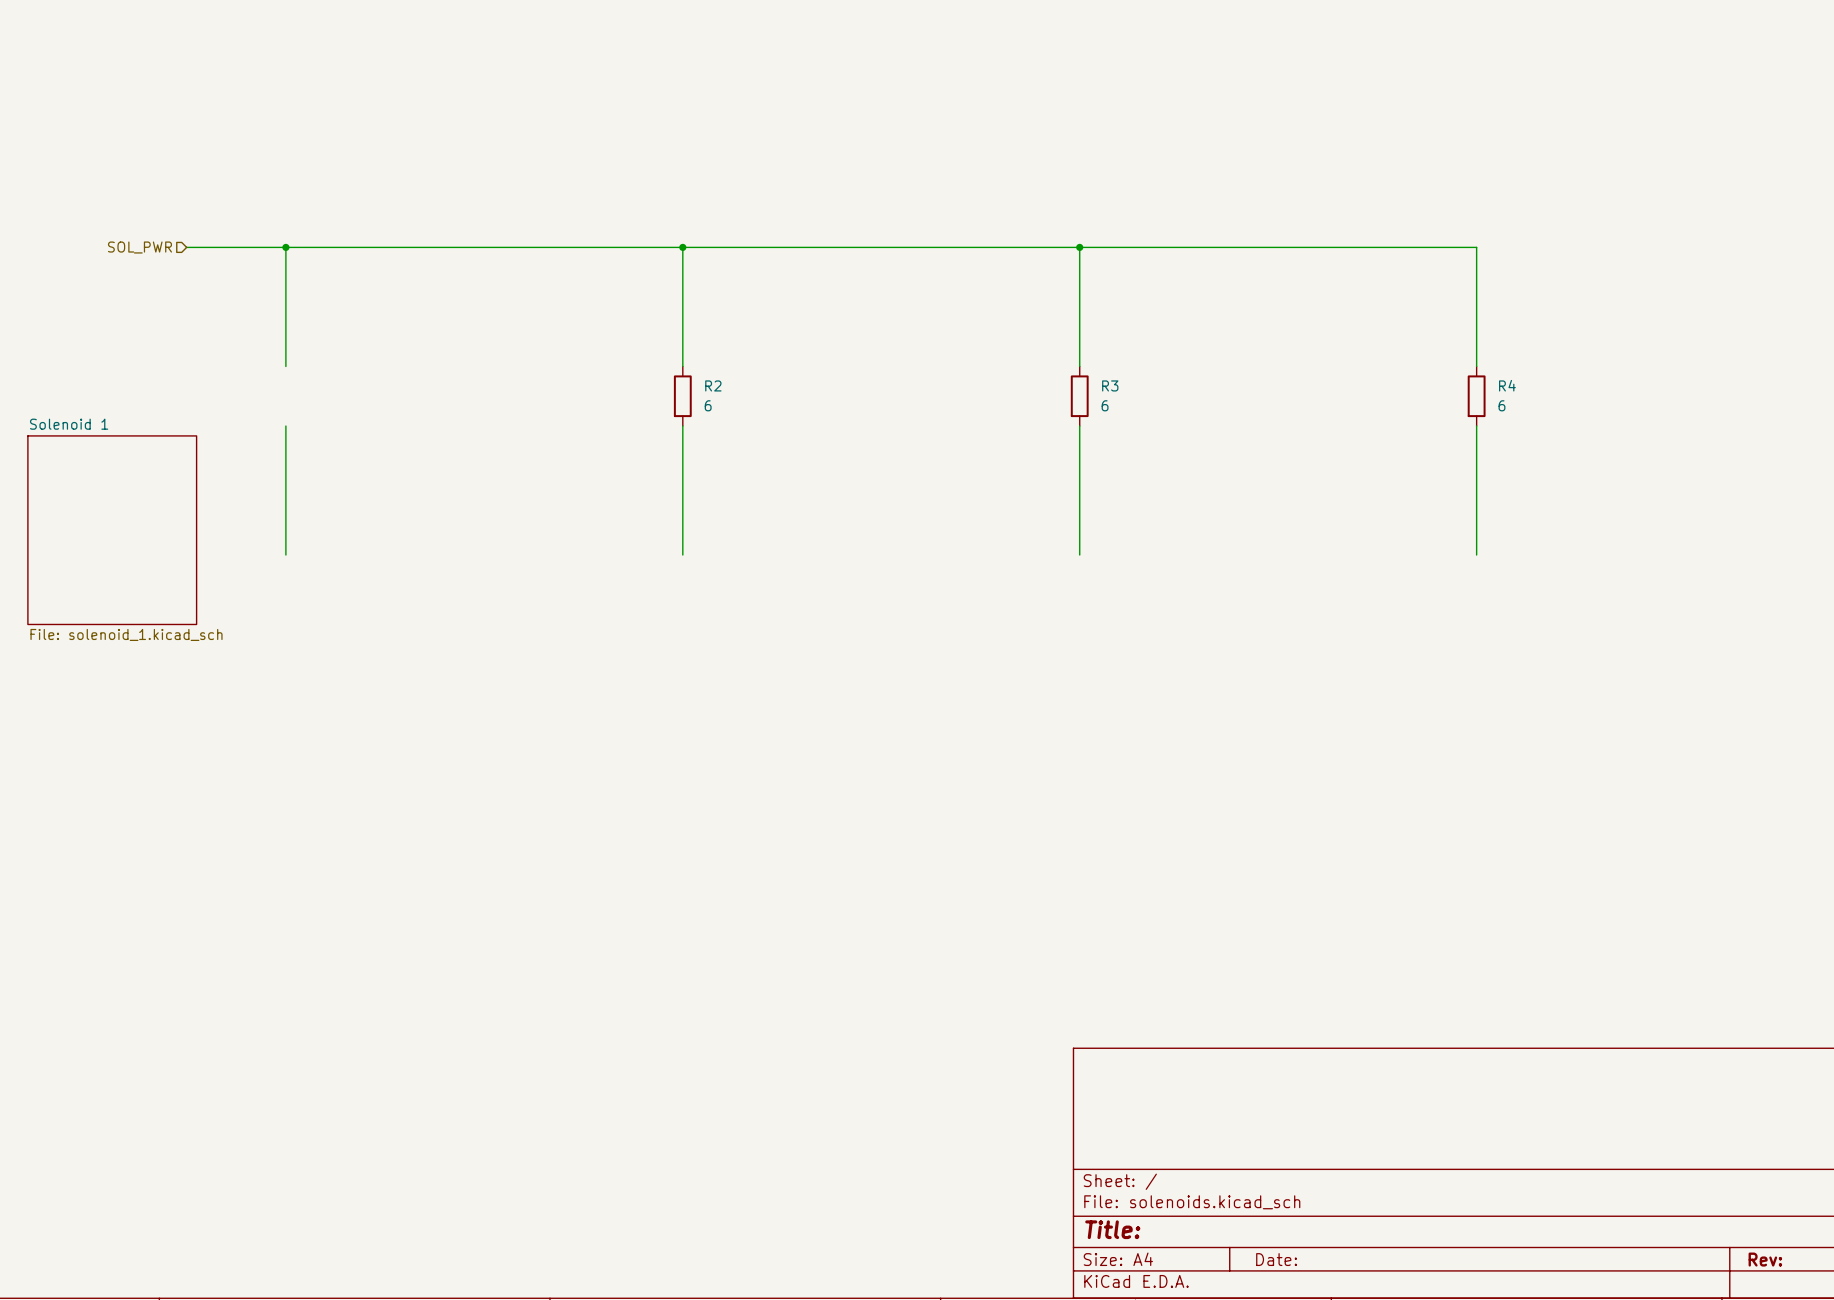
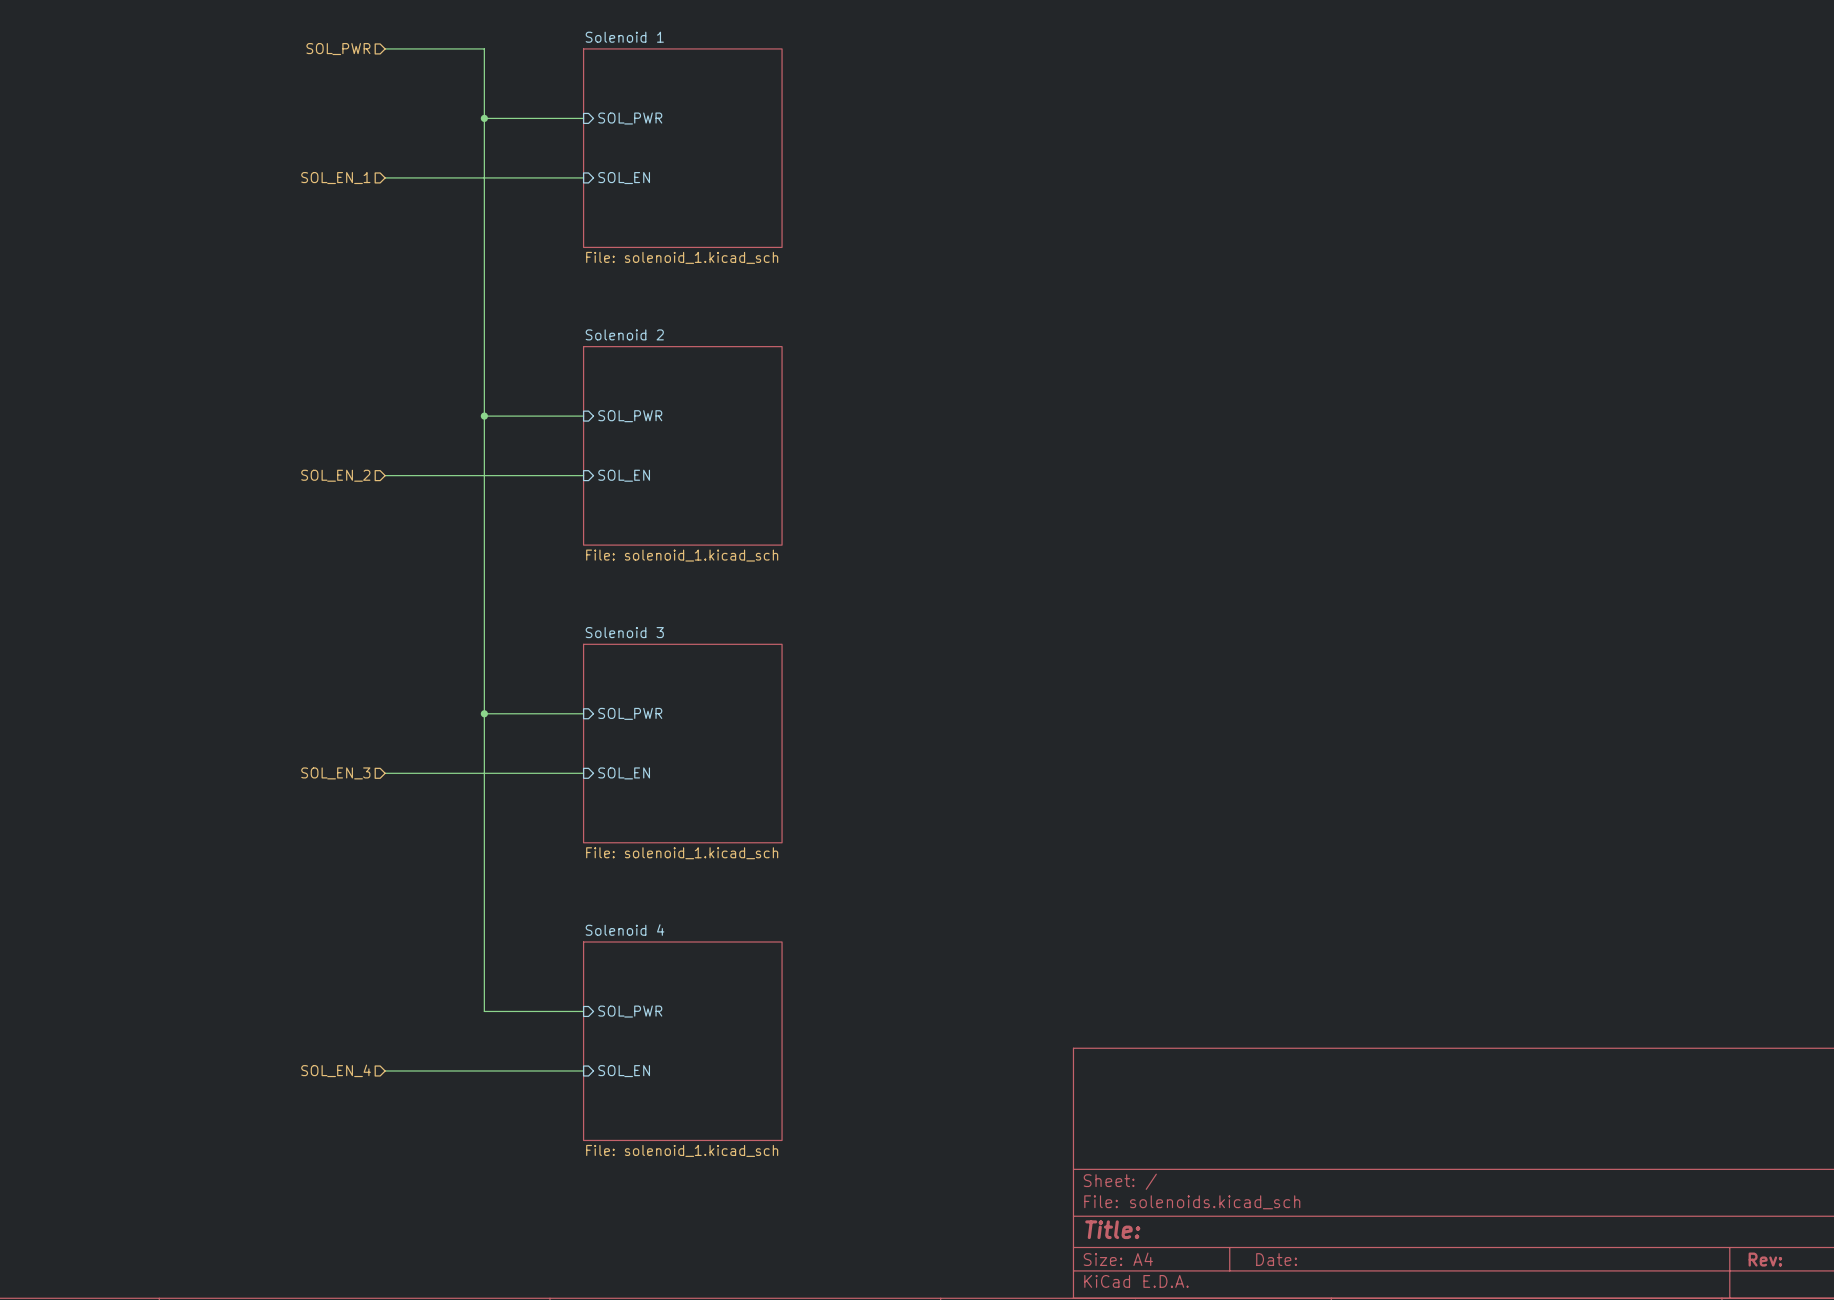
wire: none -> (385, 48) (484, 48) (484, 1011) (583, 1011)
hierarchical label: none -> SOL_PWR (338, 49)
wire: none -> (484, 118) (583, 118)
junction: none -> (484, 118)
sheet pin: none -> SOL_PWR (630, 118)
wire: none -> (385, 177) (583, 177)
hierarchical label: none -> SOL_EN_1 (335, 178)
sheet pin: none -> SOL_EN (624, 178)
hierarchical label: SOL_PWR (139, 247) -> none
wire: (186, 247) (1476, 247) (1476, 366) -> none
wire: (285, 247) (285, 366) -> none
junction: (285, 247) -> none
wire: (682, 247) (682, 366) -> none
junction: (682, 247) -> none
wire: (1079, 247) (1079, 366) -> none
junction: (1079, 247) -> none
R2: 6 (682, 396) -> none
R3: 6 (1079, 396) -> none
R4: 6 (1476, 396) -> none
wire: none -> (484, 416) (583, 416)
junction: none -> (484, 416)
sheet pin: none -> SOL_PWR (630, 416)
sheet Solenoid 1 name position: Solenoid 1 (69, 424) -> Solenoid 1 (624, 37)
wire: (285, 426) (285, 555) -> none
wire: (682, 426) (682, 555) -> none
wire: (1079, 426) (1079, 555) -> none
wire: (1476, 426) (1476, 555) -> none
sheet Solenoid 1 shape: [27, 435, 198, 626] -> [582, 48, 783, 249]
sheet Solenoid 2: none -> File: solenoid_1.kicad_sch (682, 445)
hierarchical label: none -> SOL_EN_2 (335, 475)
wire: none -> (385, 475) (583, 475)
sheet pin: none -> SOL_EN (624, 475)
sheet Solenoid 1 value position: File: solenoid_1.kicad_sch (126, 634) -> File: solenoid_1.kicad_sch (682, 257)
wire: none -> (484, 713) (583, 713)
junction: none -> (484, 713)
sheet pin: none -> SOL_PWR (630, 713)
sheet Solenoid 3: none -> File: solenoid_1.kicad_sch (682, 743)
hierarchical label: none -> SOL_EN_3 (335, 773)
wire: none -> (385, 773) (583, 773)
sheet pin: none -> SOL_EN (624, 773)
sheet pin: none -> SOL_PWR (630, 1011)
sheet Solenoid 4: none -> File: solenoid_1.kicad_sch (682, 1041)
hierarchical label: none -> SOL_EN_4 (336, 1070)
wire: none -> (385, 1070) (583, 1070)
sheet pin: none -> SOL_EN (624, 1071)

